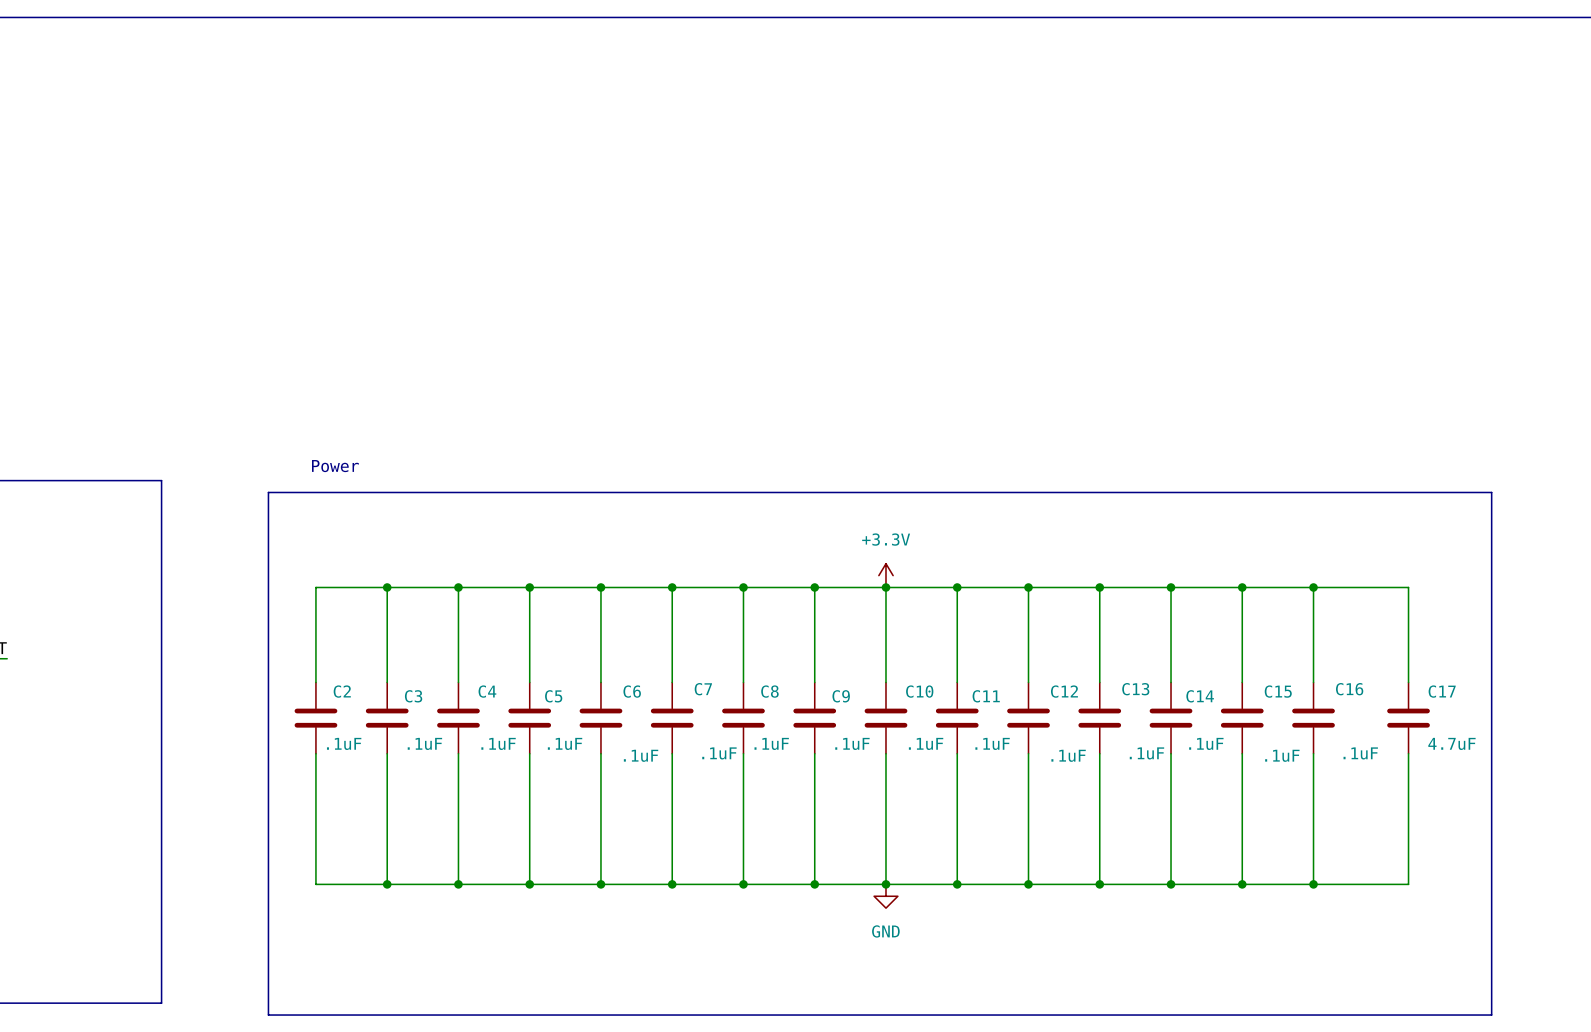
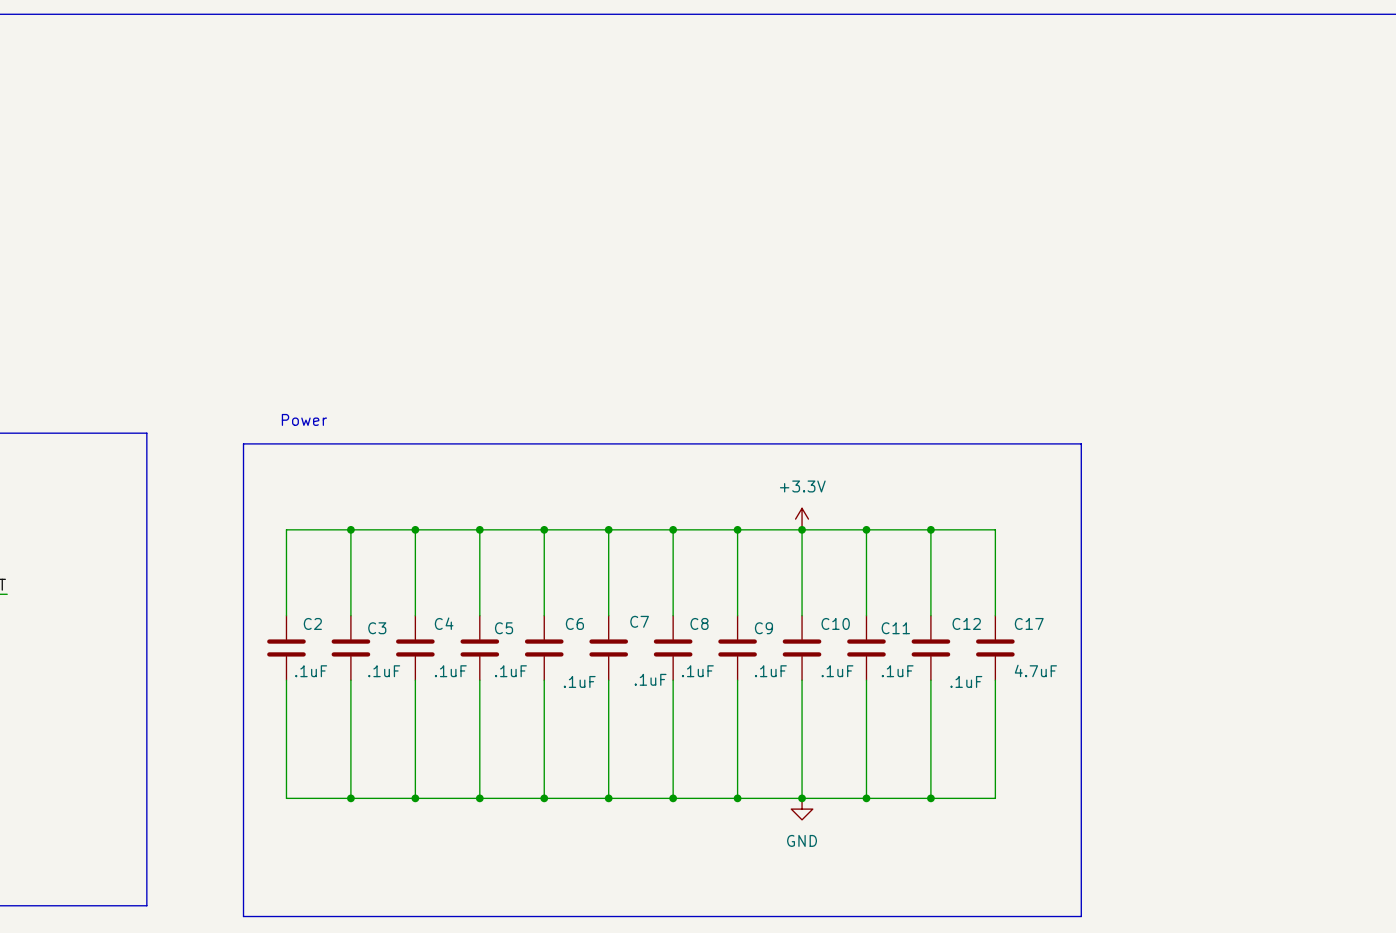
line: (1194, 492) (1491, 492) (1491, 1015) (1194, 1015) -> (1081, 443) (1081, 916)
wire: (1099, 587) (1408, 587) (1408, 682) -> none
junction: (1099, 587) -> none
wire: (1171, 587) (1171, 682) -> none
junction: (1171, 587) -> none
wire: (1242, 587) (1242, 682) -> none
junction: (1242, 587) -> none
wire: (1313, 587) (1313, 682) -> none
junction: (1313, 587) -> none
C13 name: C13 (1135, 689) -> C17 (1029, 623)
C14: .1uF (1171, 718) -> none
C15: .1uF (1242, 718) -> none
C16: .1uF (1313, 718) -> none
C17: 4.7uF (1408, 718) -> none
C13 value: .1uF (1146, 753) -> 4.7uF (1035, 670)
wire: (1171, 753) (1171, 884) -> none
wire: (1242, 753) (1242, 884) -> none
wire: (1313, 753) (1313, 884) -> none
wire: (1408, 753) (1408, 884) (1099, 884) -> none
junction: (1099, 884) -> none
junction: (1171, 884) -> none
junction: (1242, 884) -> none
junction: (1313, 884) -> none

